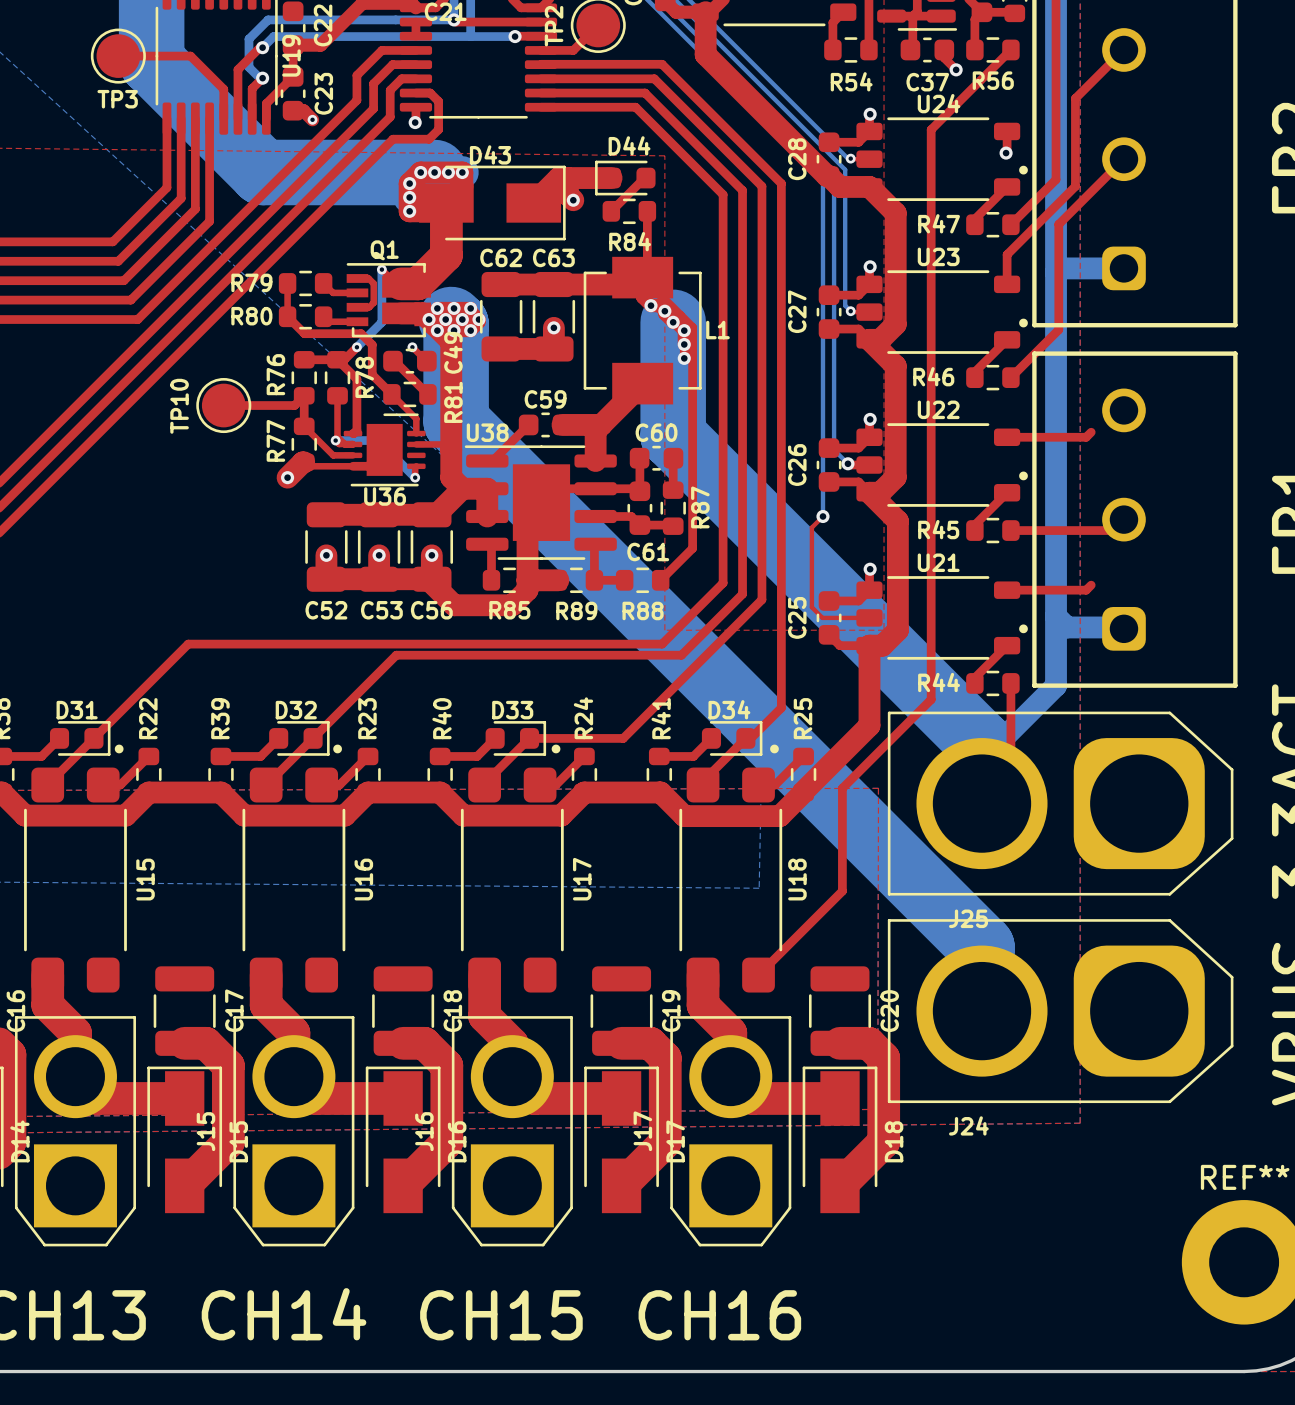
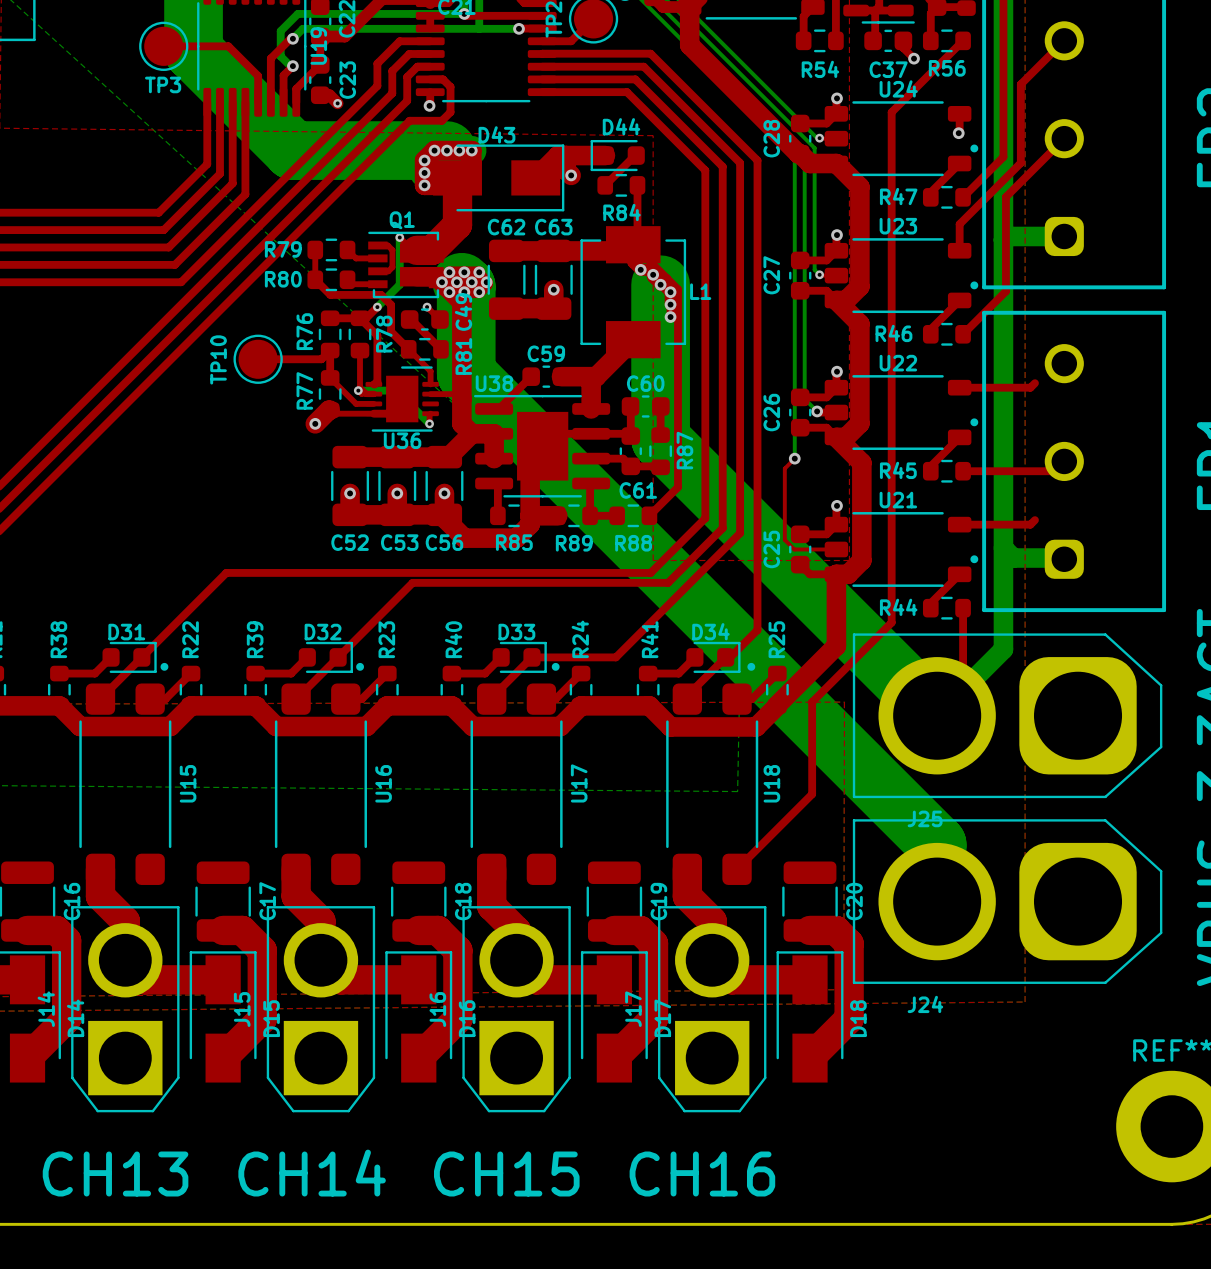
bottom track: (673, 436) (981, 744) (981, 803) (981, 759) (1056, 685) -> (660, 386) (660, 439) (937, 715) (1003, 649) (1003, 610)

